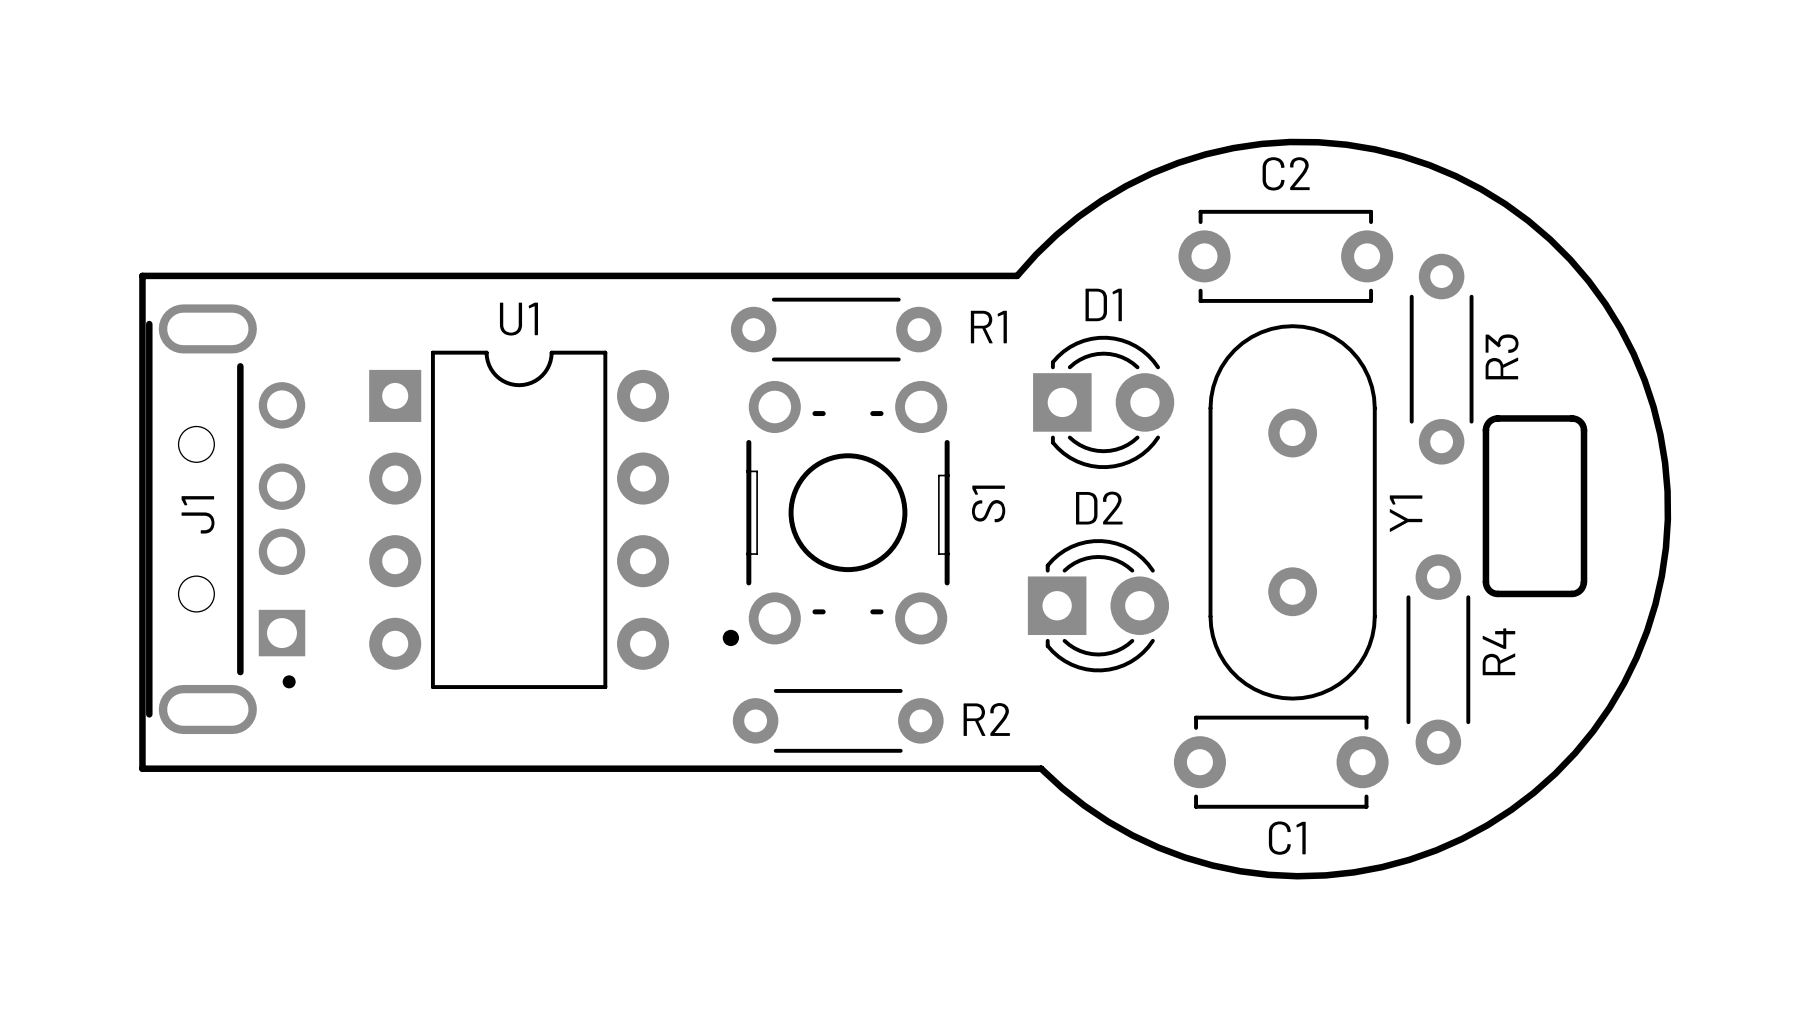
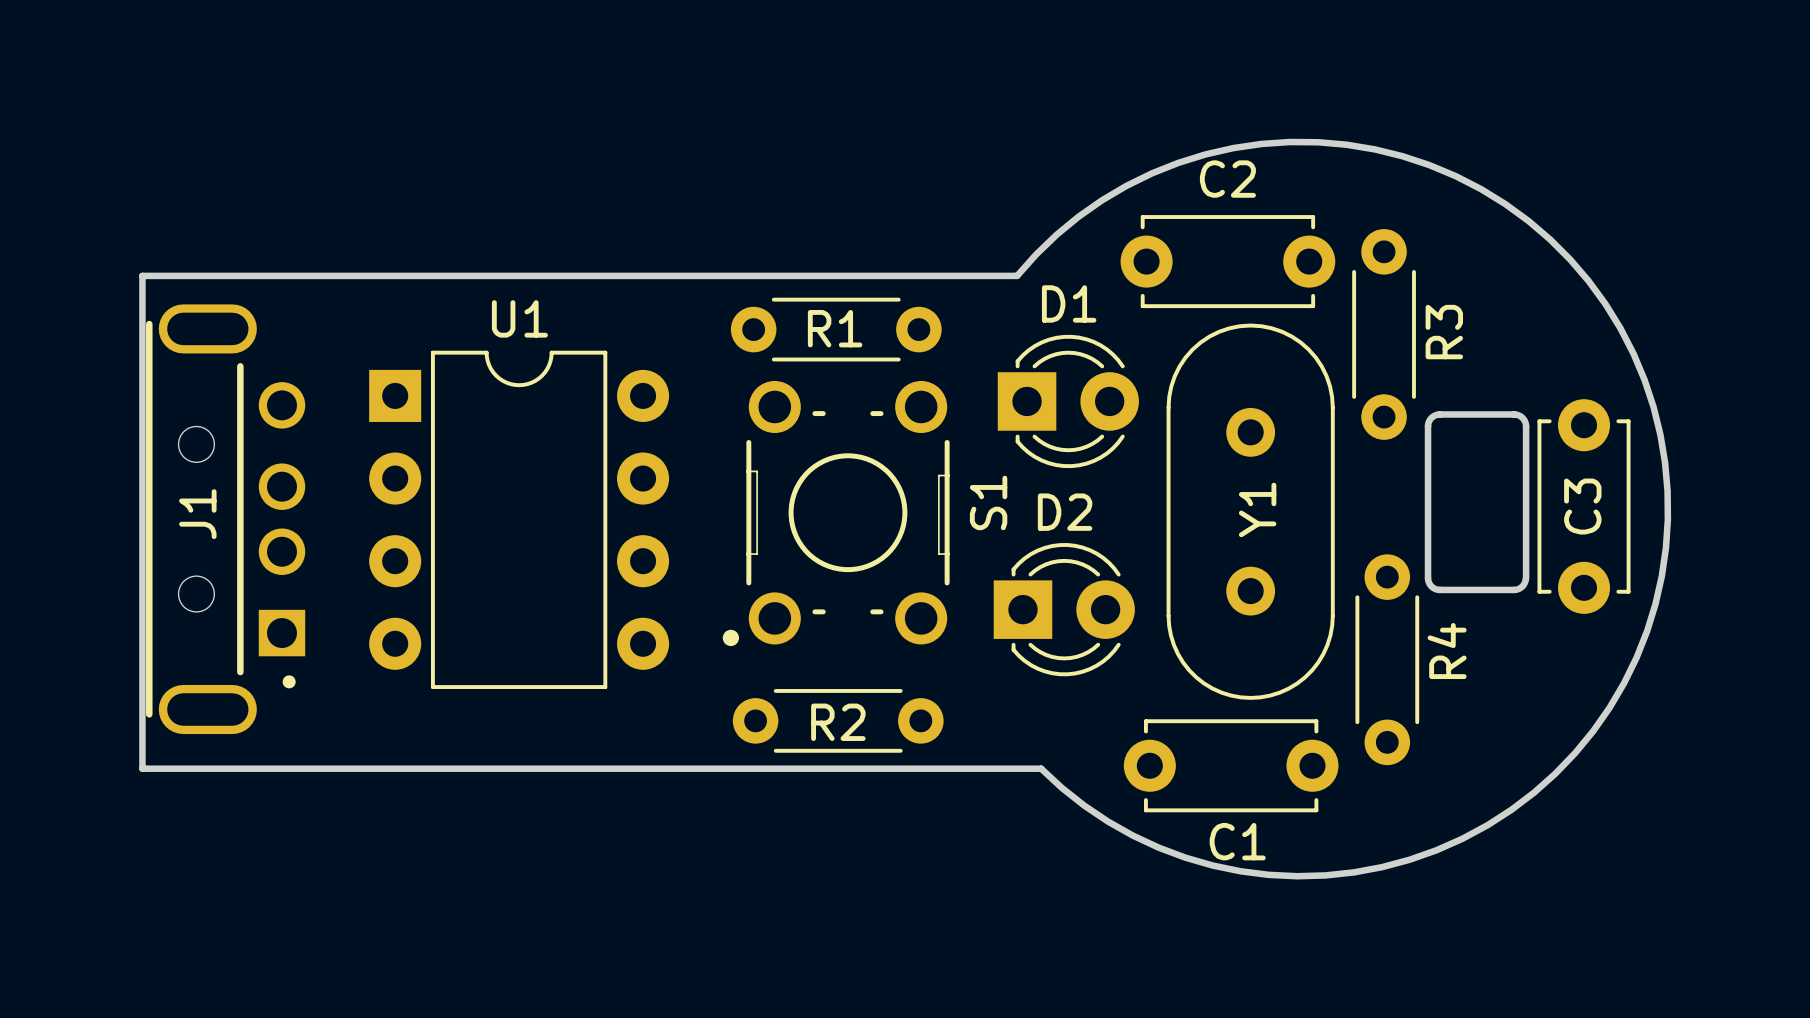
C2 position: (1285, 256) -> (1227, 261)
R1 name position: R1 (988, 327) -> R1 (835, 328)
R3 position: (1441, 359) -> (1384, 334)
D1 position: (1103, 402) -> (1068, 401)
board edge: (1497, 418) (1489, 421) (1485, 430) -> (1439, 414) (1431, 417) (1428, 426)
board edge: (1497, 418) (1572, 418) -> (1439, 414) (1514, 414)
board edge: (1572, 418) (1579, 421) (1583, 429) (1584, 582) -> (1514, 414) (1521, 417) (1526, 425) (1526, 578)
board edge: (1485, 430) (1485, 582) (1487, 588) (1496, 593) (1573, 593) (1580, 590) (1583, 582) -> (1428, 426) (1428, 578) (1429, 584) (1438, 589) (1515, 589) (1522, 586) (1525, 578)
C3: none -> (1584, 506)
Y1 position: (1292, 512) -> (1250, 511)
Y1 name position: Y1 (1406, 513) -> Y1 (1257, 509)
D2 position: (1098, 605) -> (1064, 609)
R4 position: (1438, 659) -> (1387, 659)
R2 name position: R2 (986, 719) -> R2 (838, 722)
C1 position: (1281, 762) -> (1231, 765)

